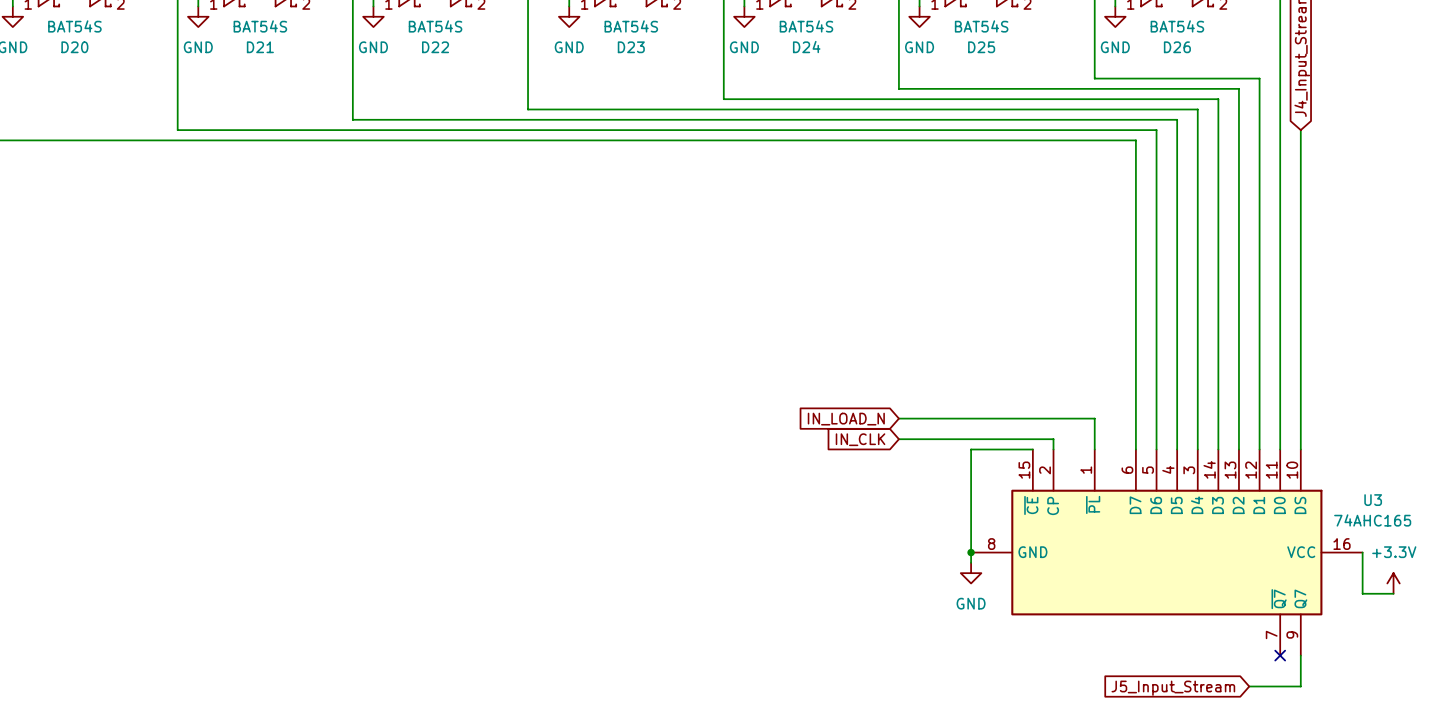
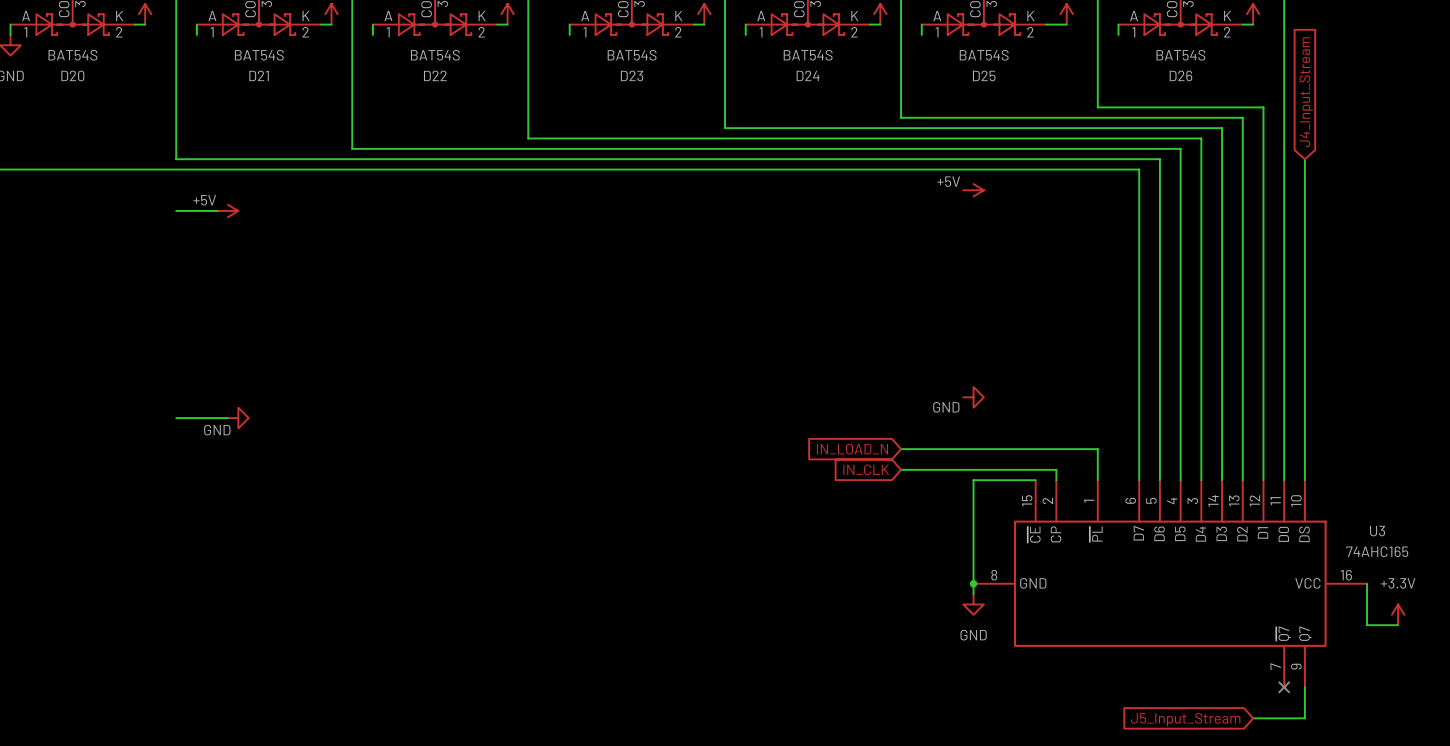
power symbol: GND (198, 16) -> none
power symbol: GND (373, 16) -> none
power symbol: GND (569, 16) -> none
power symbol: GND (744, 16) -> none
power symbol: GND (919, 16) -> none
power symbol: GND (1115, 16) -> none
power symbol: none -> +5V (973, 190)
wire: none -> (176, 210) (217, 210)
power symbol: none -> +5V (227, 210)
power symbol: none -> GND (973, 397)
wire: none -> (176, 418) (227, 418)
power symbol: none -> GND (238, 418)

